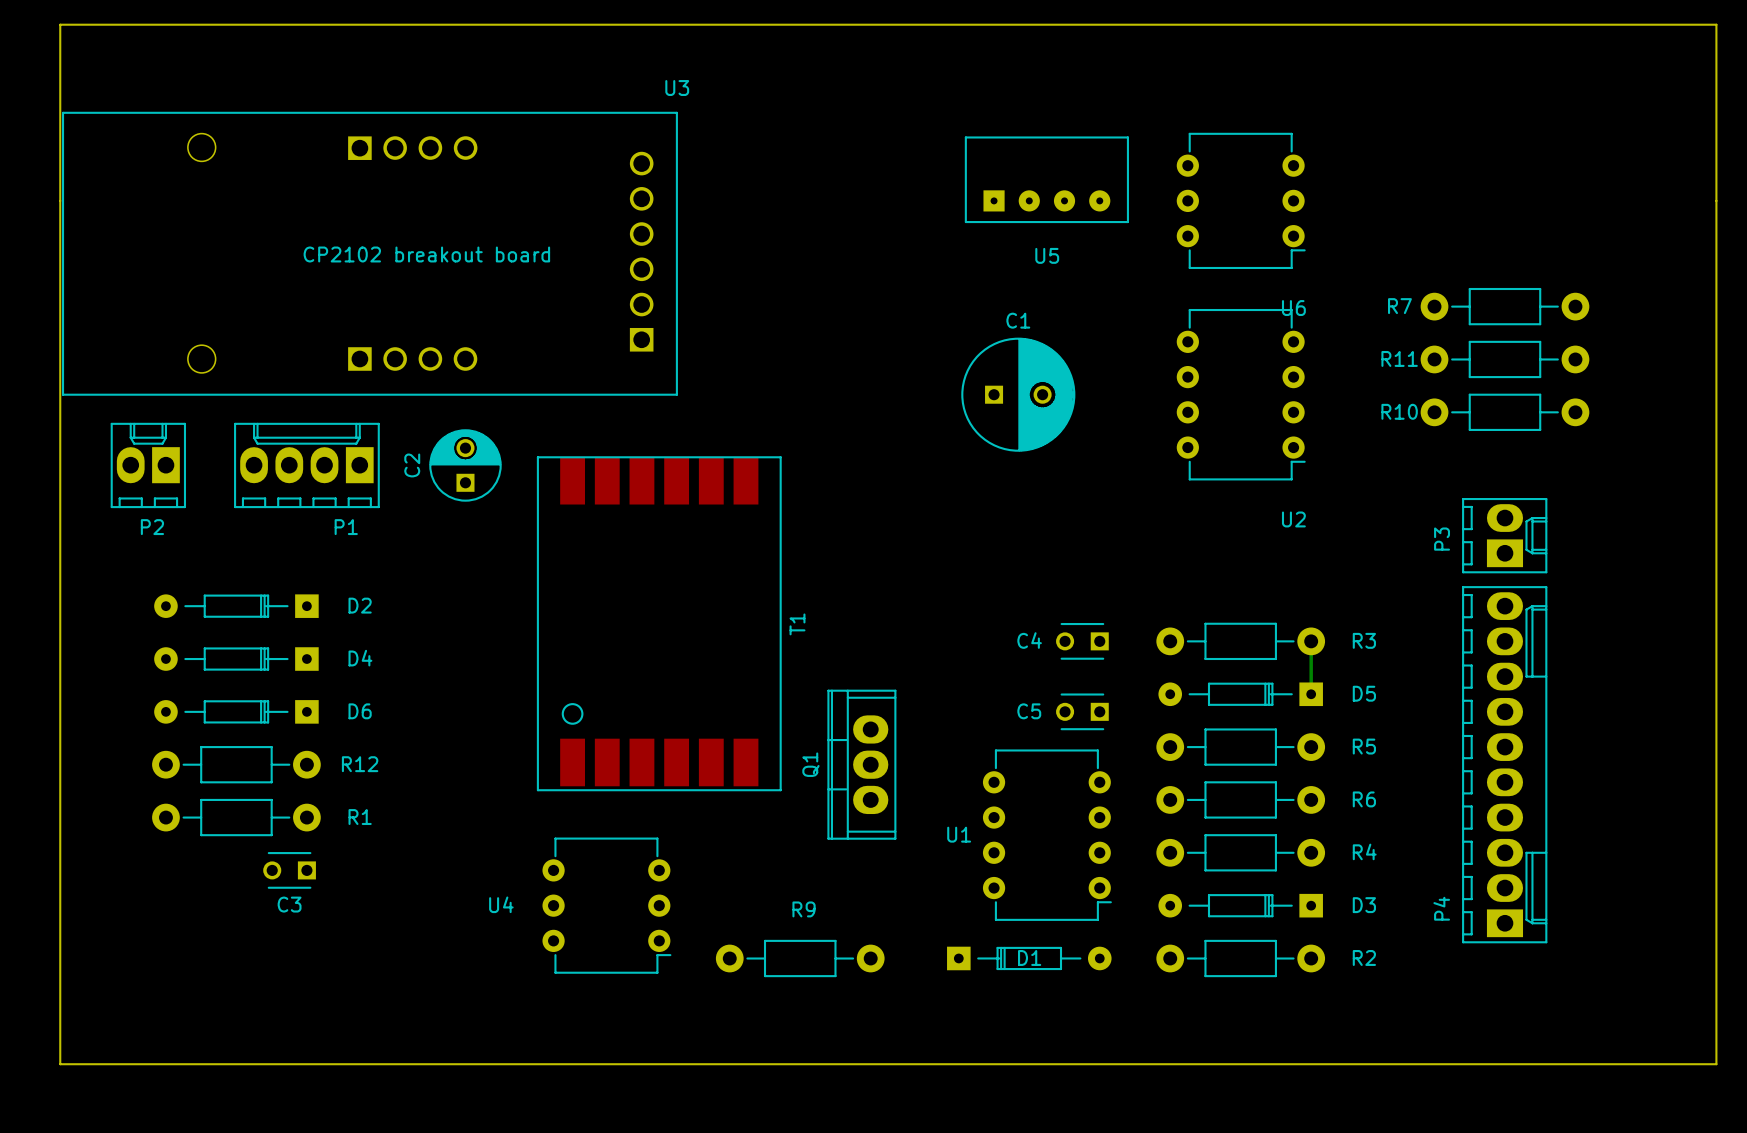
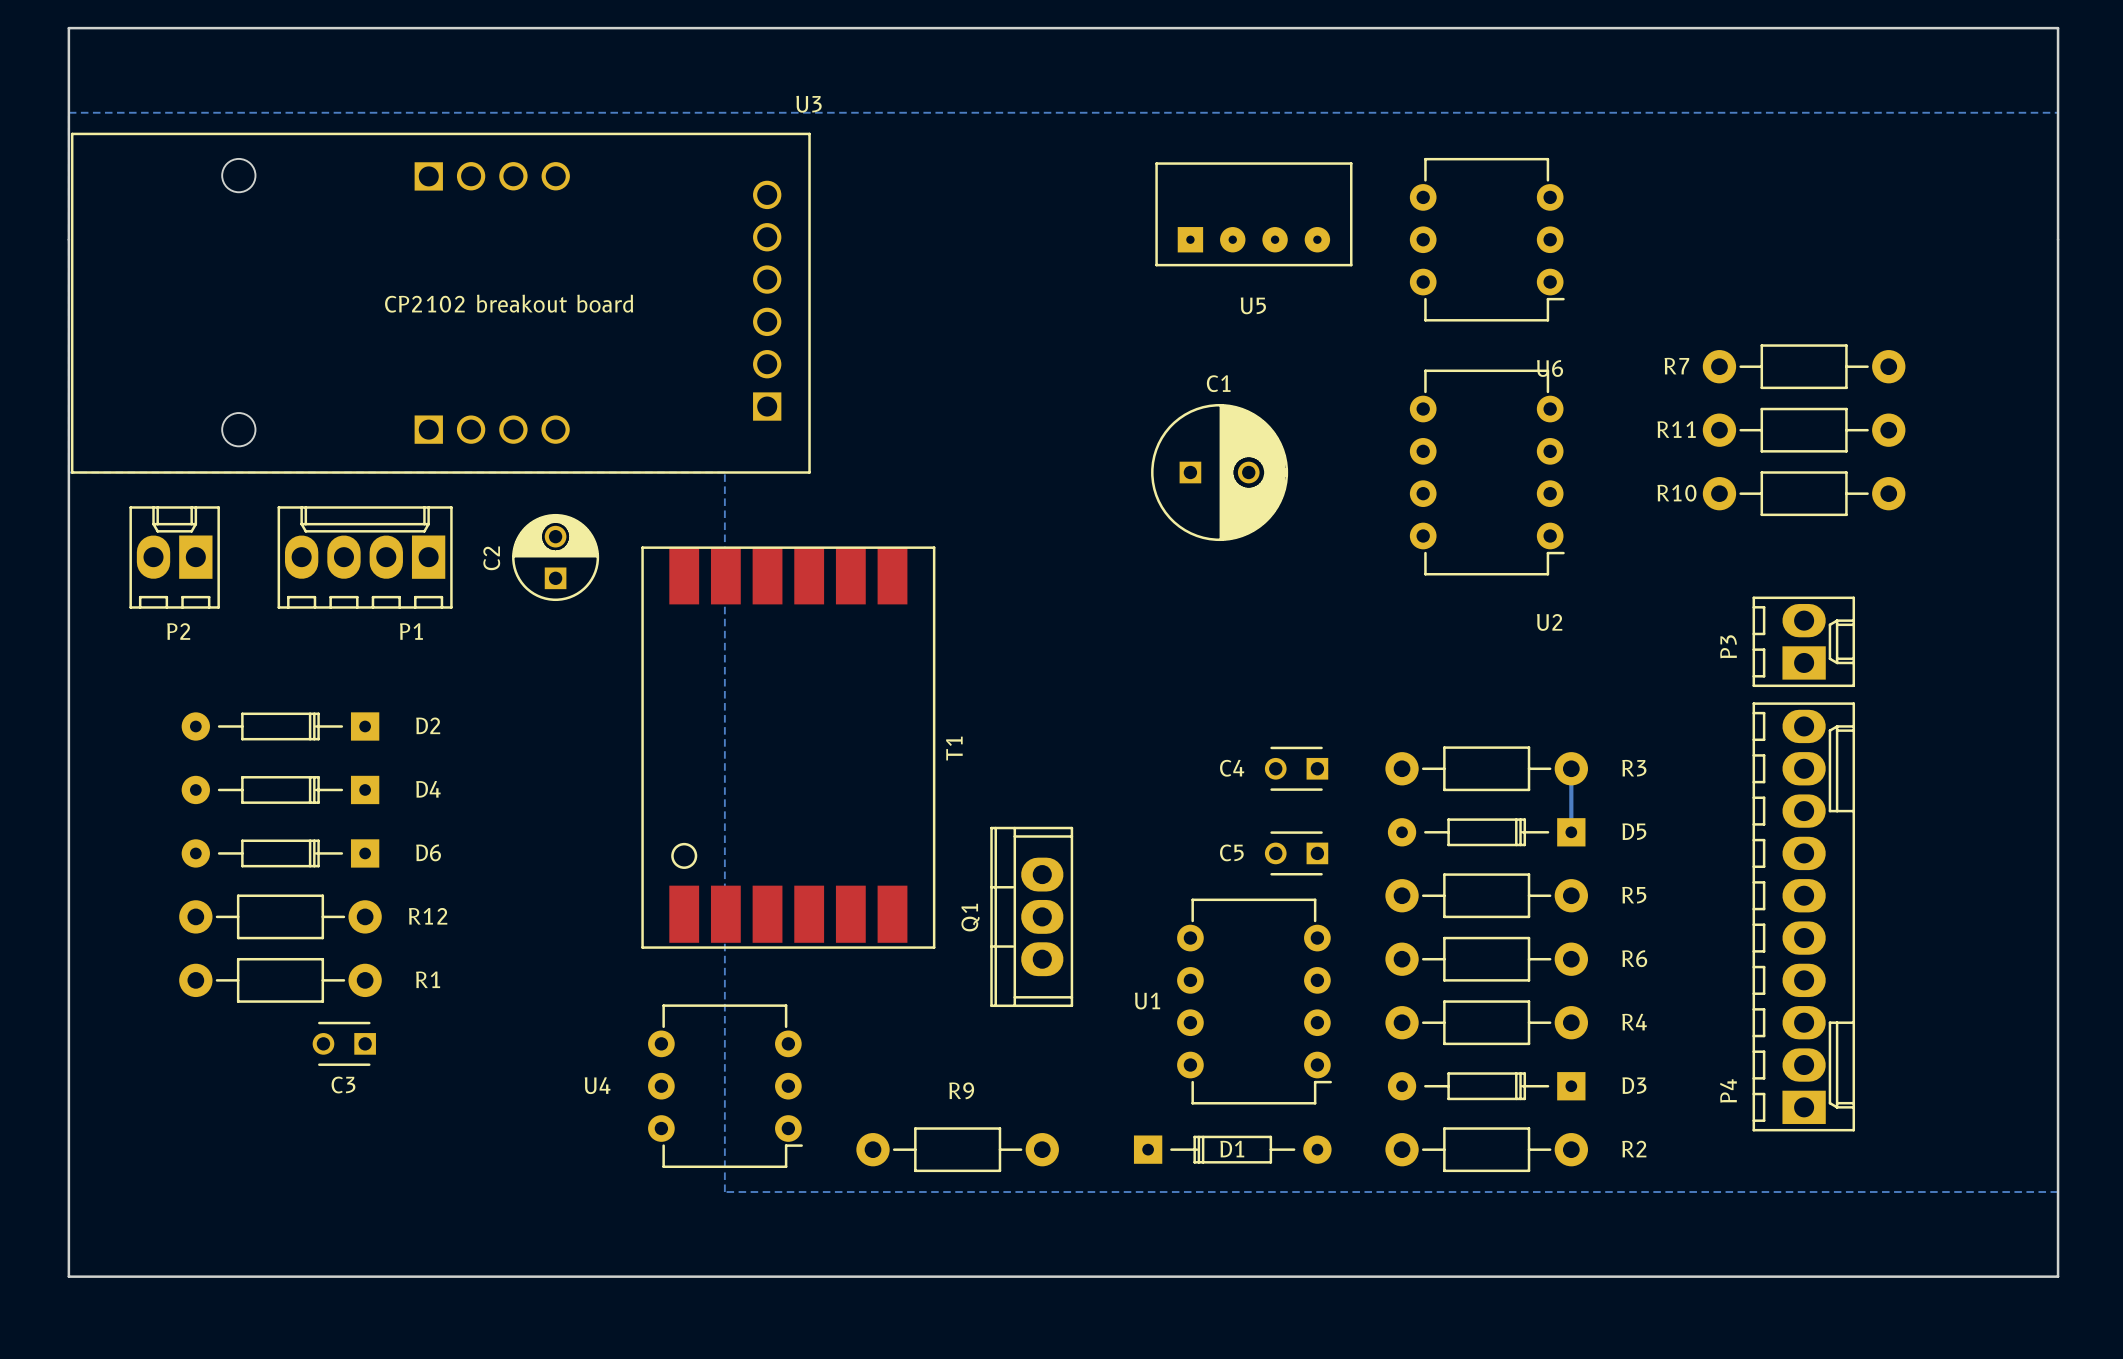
bottom zone outline: none -> (68, 112) (68, 472) (724, 472) (724, 1192) (2058, 1192) (2058, 112) (68, 112)

